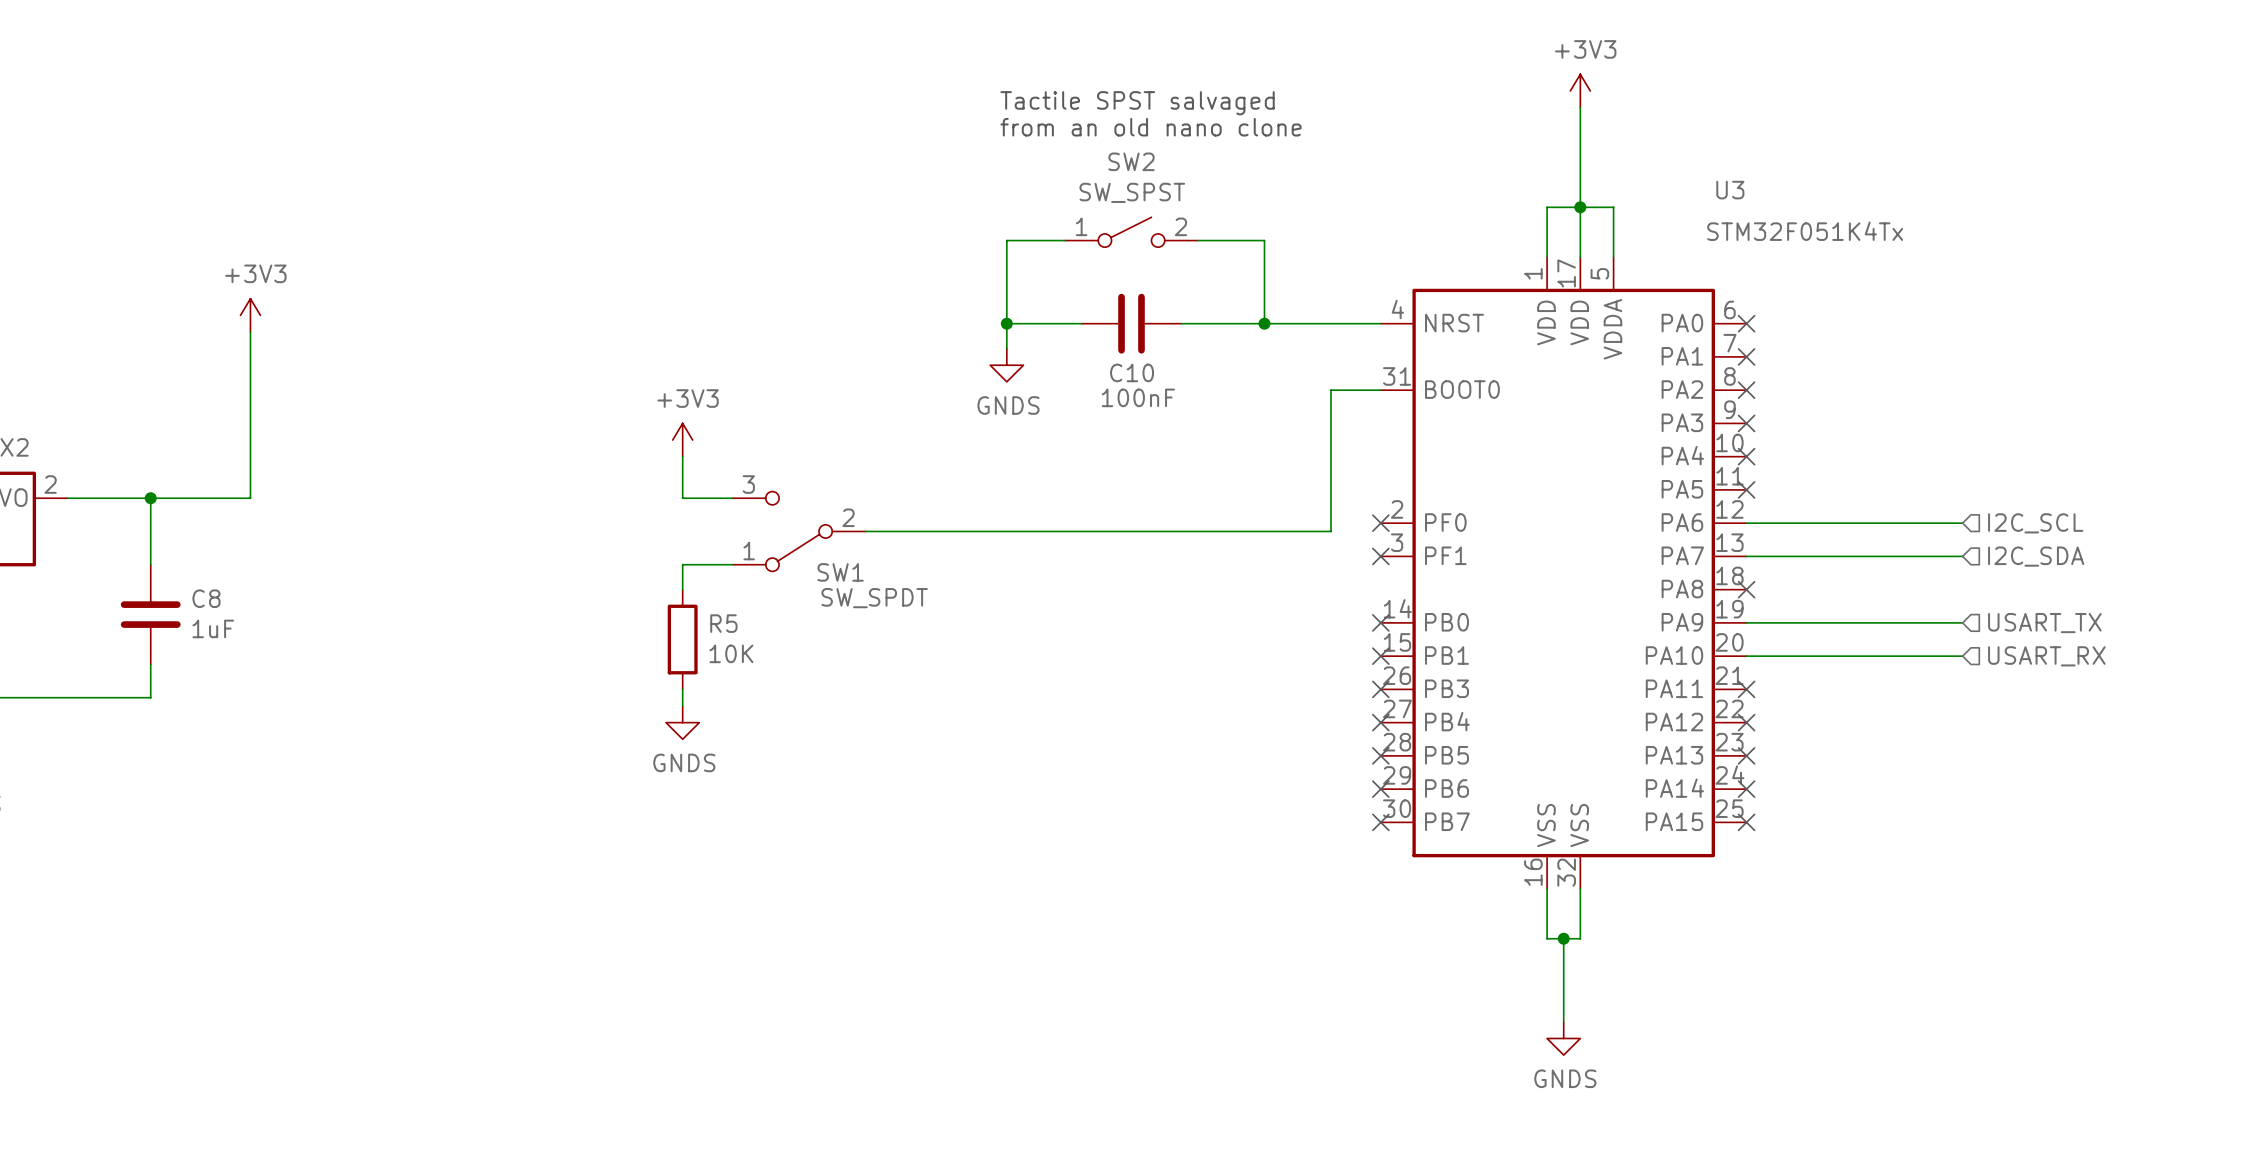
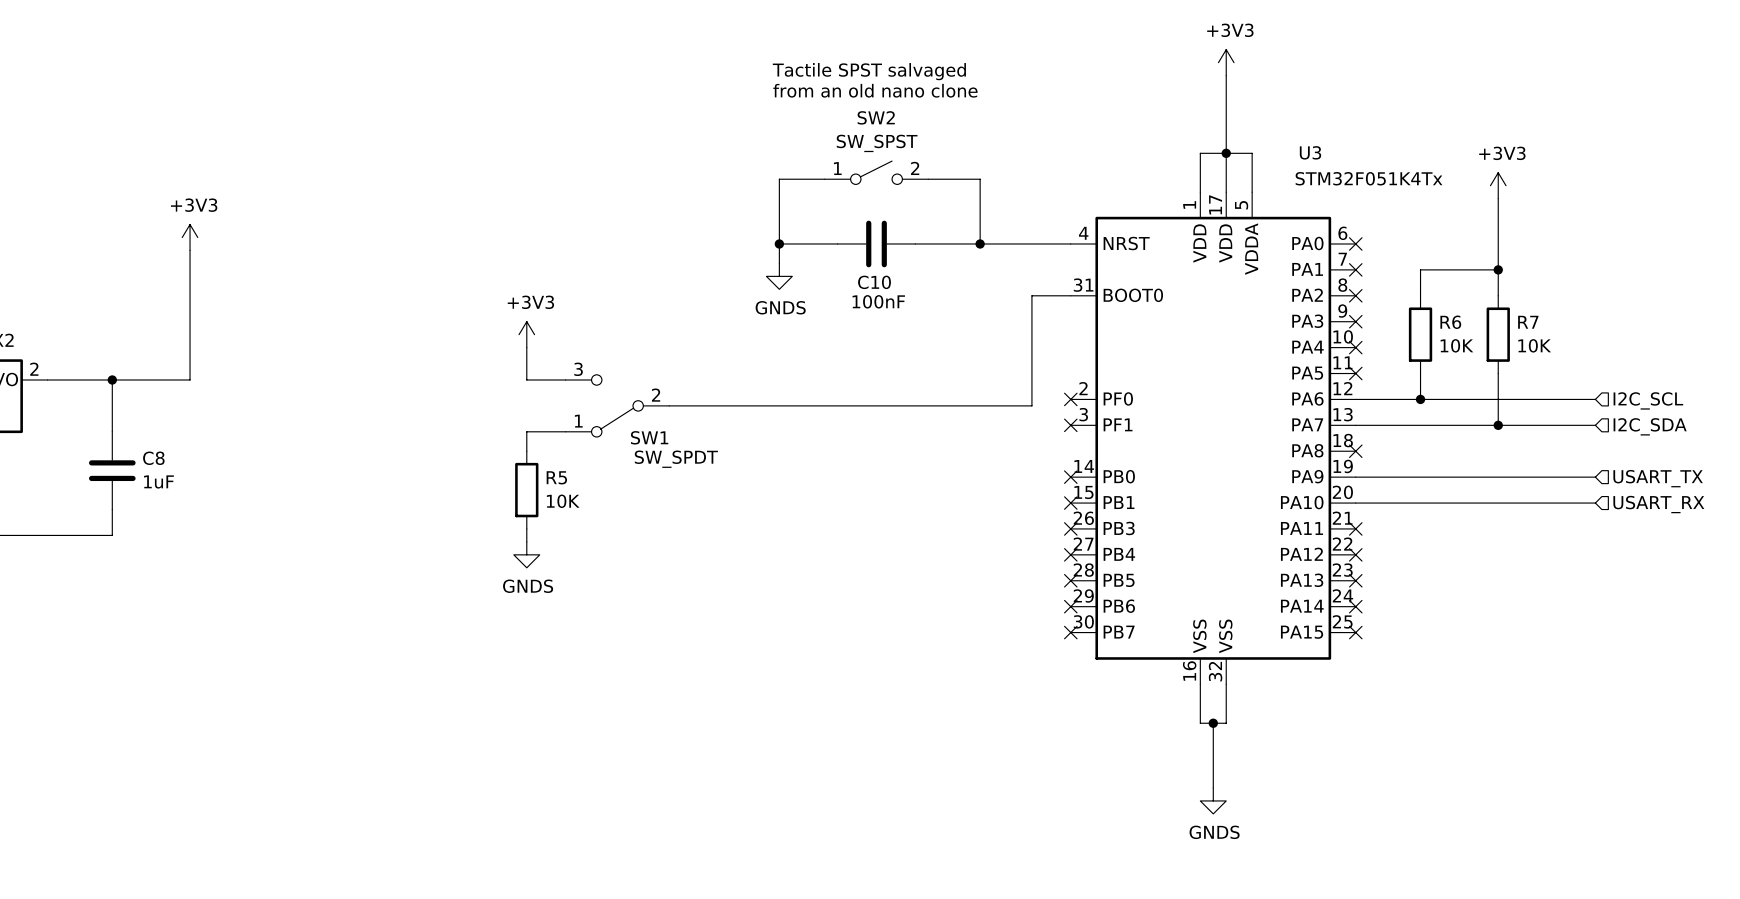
U3 name position: U3 (1730, 190) -> U3 (1310, 152)
U3 value position: STM32F051K4Tx (1805, 231) -> STM32F051K4Tx (1369, 178)
power symbol: none -> +3V3 (1498, 185)
wire: none -> (1498, 198) (1498, 295)
wire: none -> (1498, 269) (1420, 269) (1420, 295)
junction: none -> (1498, 269)
R6: none -> 10K (1420, 334)
R7: none -> 10K (1498, 334)
wire: none -> (1420, 373) (1420, 399)
wire: none -> (1498, 373) (1498, 425)
junction: none -> (1420, 399)
wire: none -> (1524, 399) (1595, 399)
hierarchical label position: I2C_SCL (2035, 523) -> I2C_SCL (1648, 400)
junction: none -> (1498, 425)
wire: none -> (1524, 425) (1595, 425)
hierarchical label position: I2C_SDA (2036, 556) -> I2C_SDA (1650, 426)
wire: none -> (1524, 477) (1595, 477)
hierarchical label position: USART_TX (2044, 623) -> USART_TX (1658, 478)
wire: none -> (1524, 503) (1595, 503)
hierarchical label position: USART_RX (2046, 656) -> USART_RX (1658, 504)

